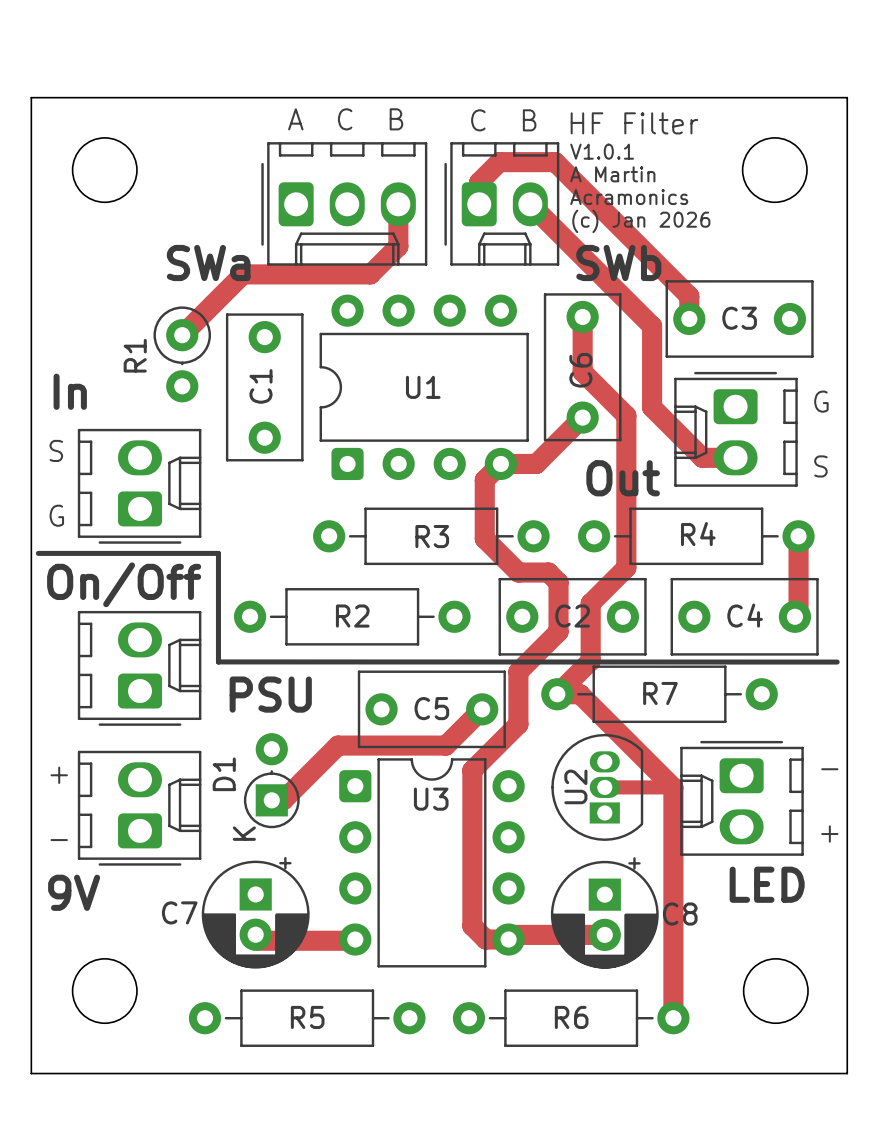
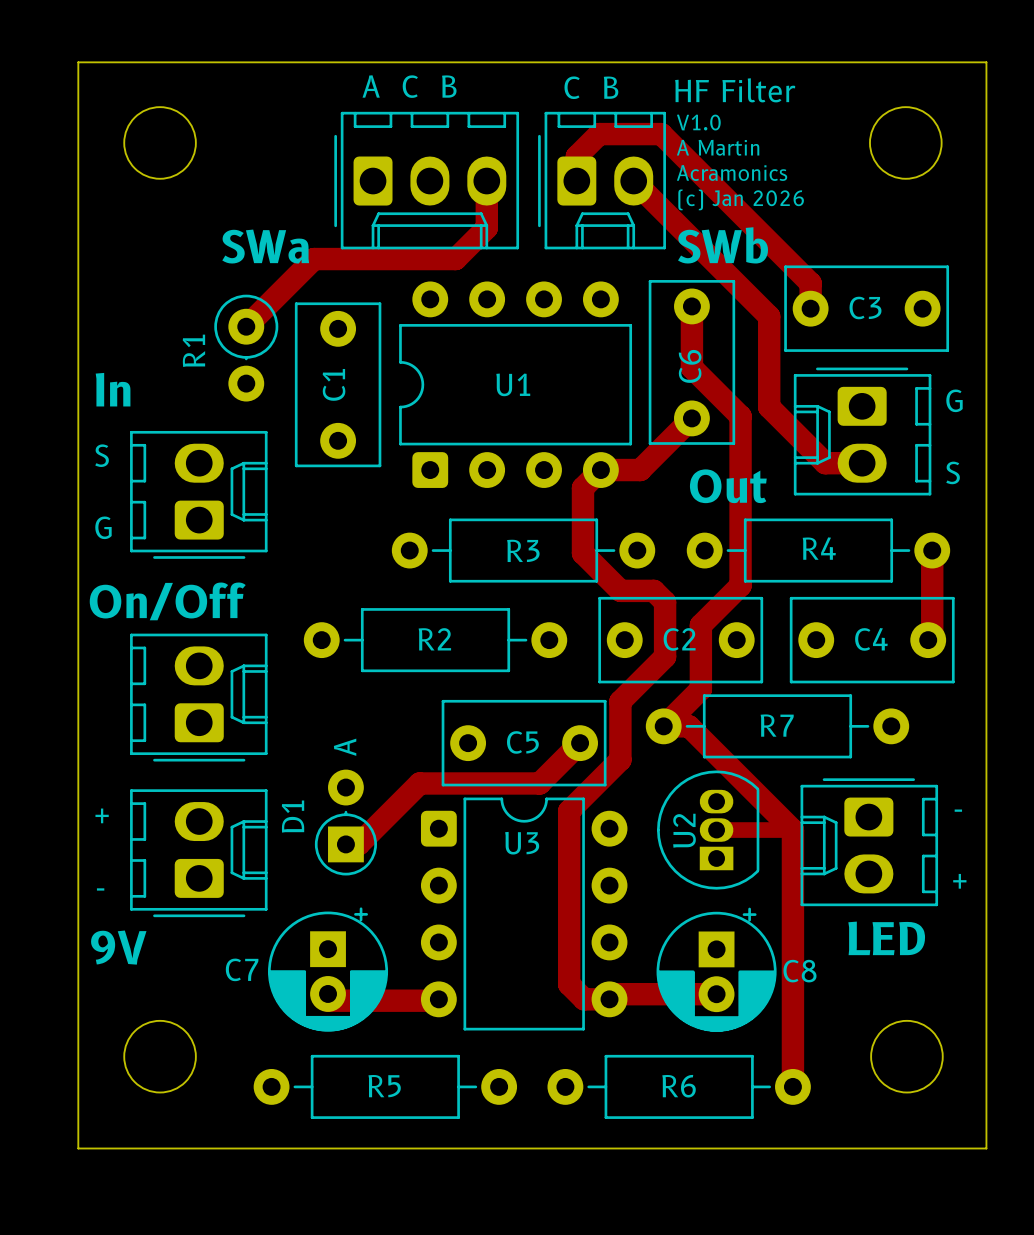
text: V1.0.1 (602, 151) -> V1.0 (698, 122)
line: (38, 553) (218, 553) (218, 662) -> none
line: (218, 661) (837, 662) -> none
text: PSU (270, 694) -> none
D1 text: none -> A (345, 747)
D1 text: K (244, 833) -> none

